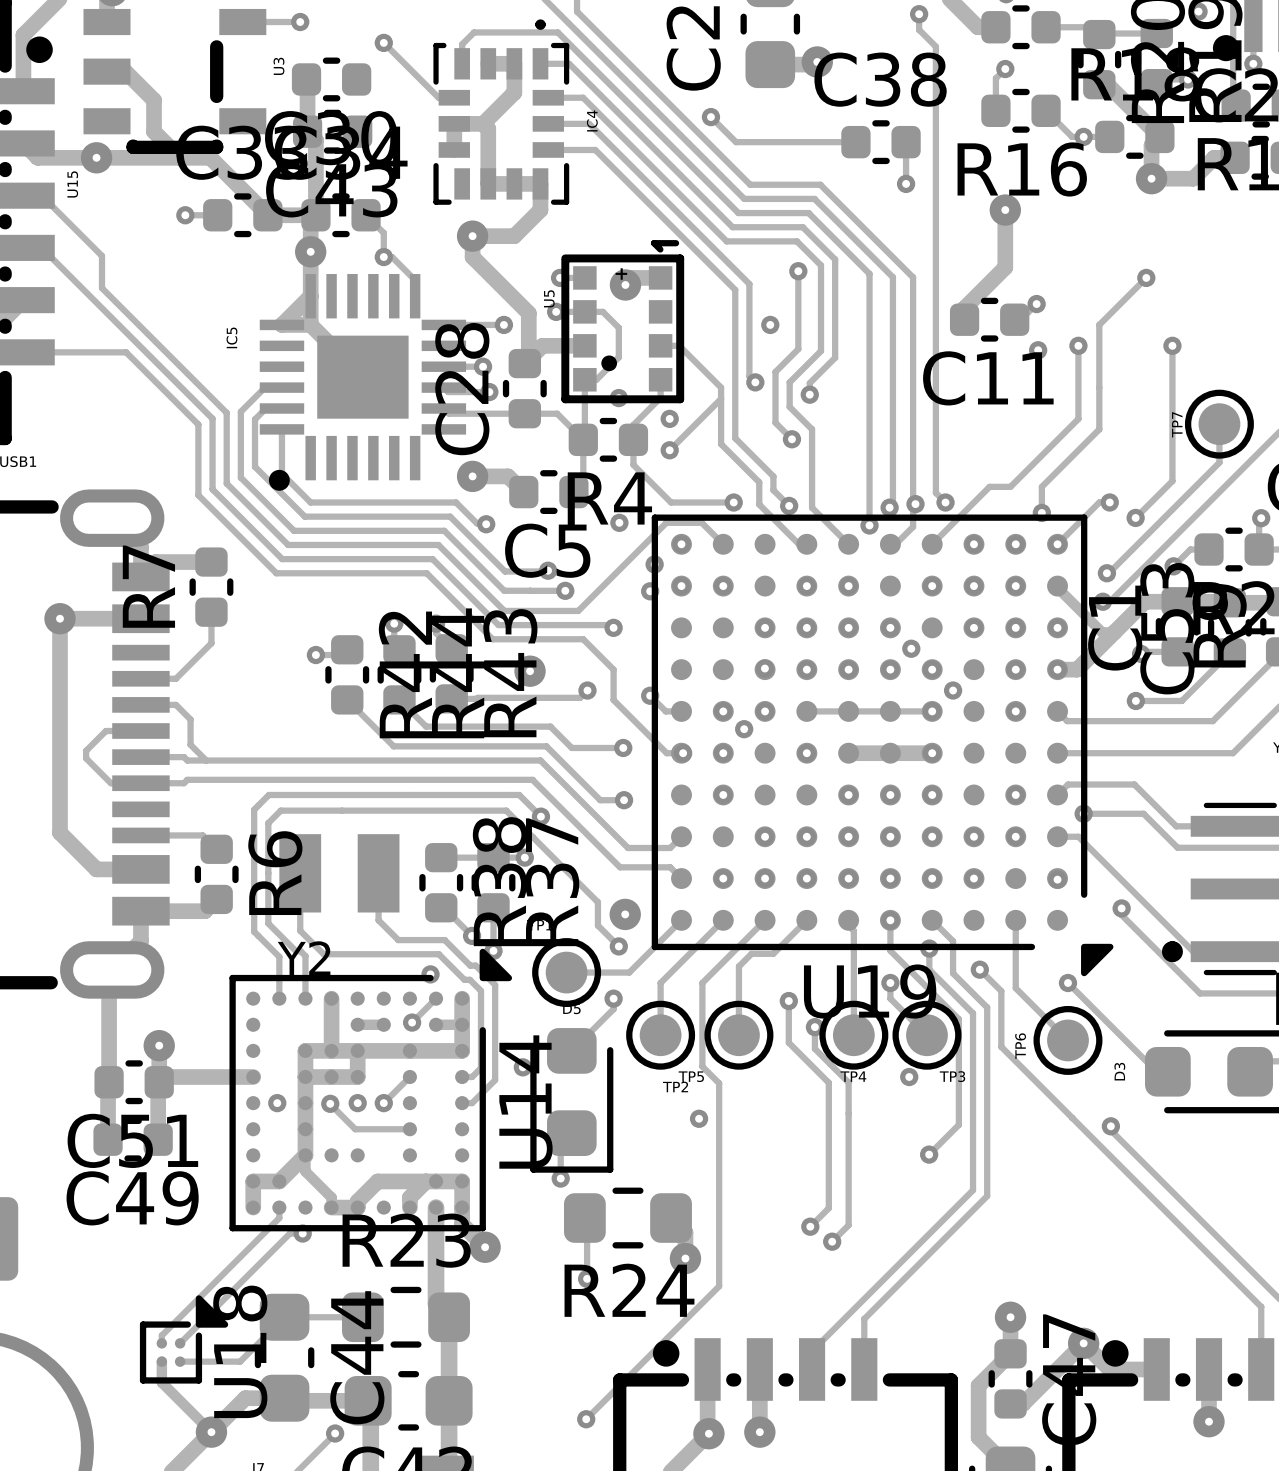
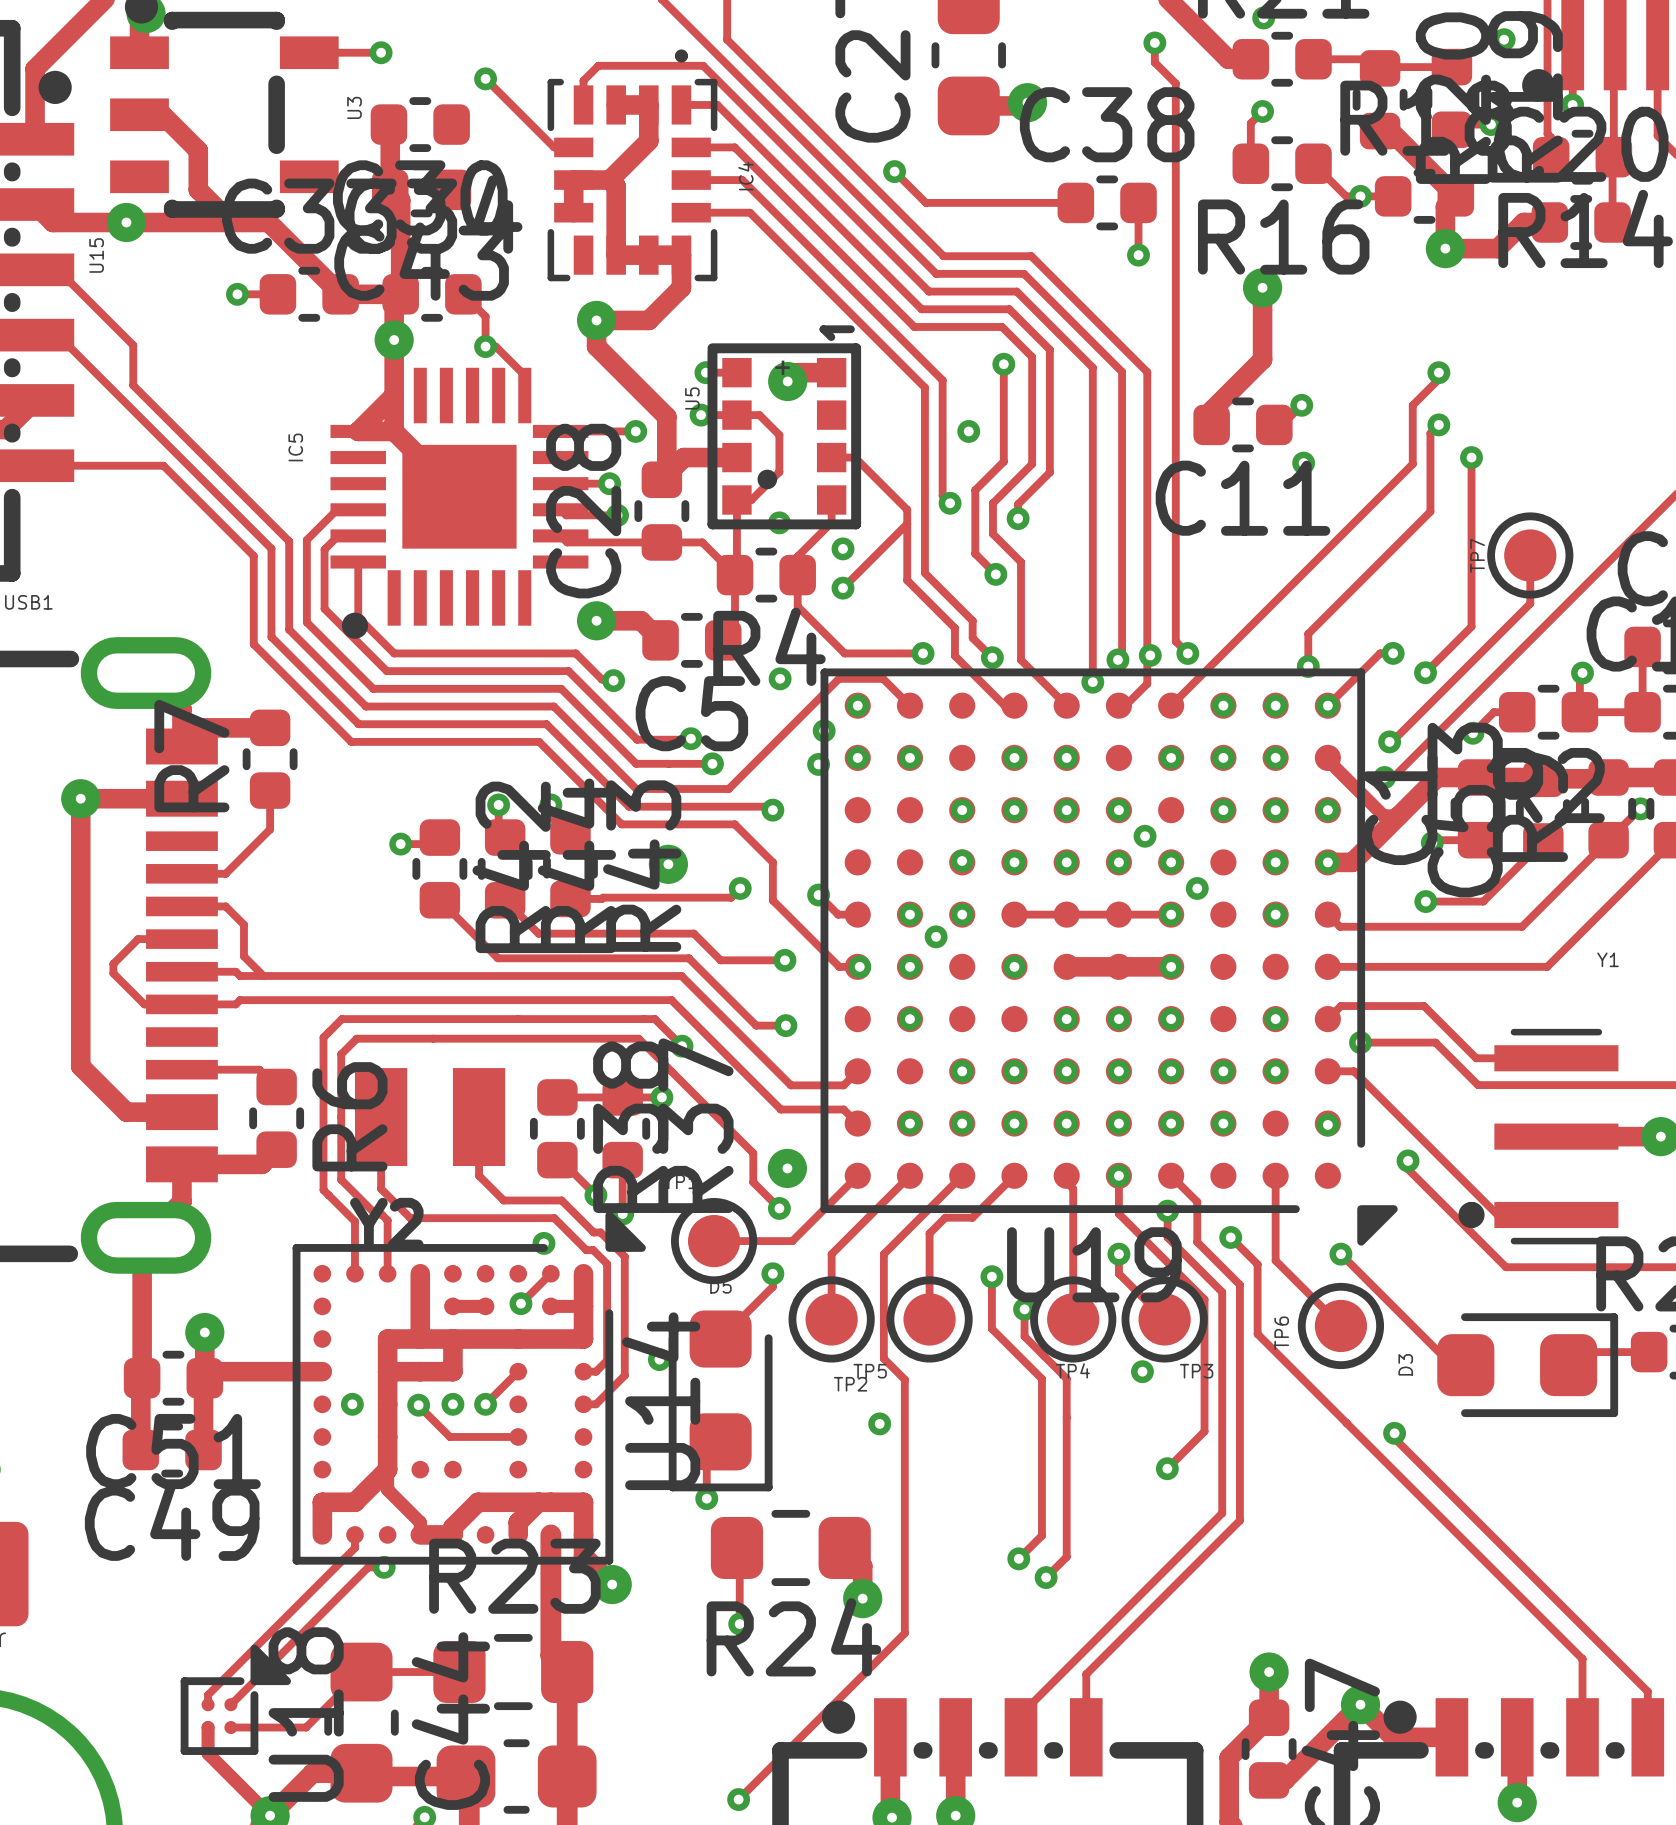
track: (1146, 277) (1099, 324) (1099, 429) -> (1438, 424) (1430, 433) (1430, 511) (1380, 562)
track: (1078, 345) (1078, 418) (1010, 486) (989, 486) -> (1438, 379) (1412, 405) (1412, 464) (1242, 633)
via position: (1078, 345) -> (1438, 424)

